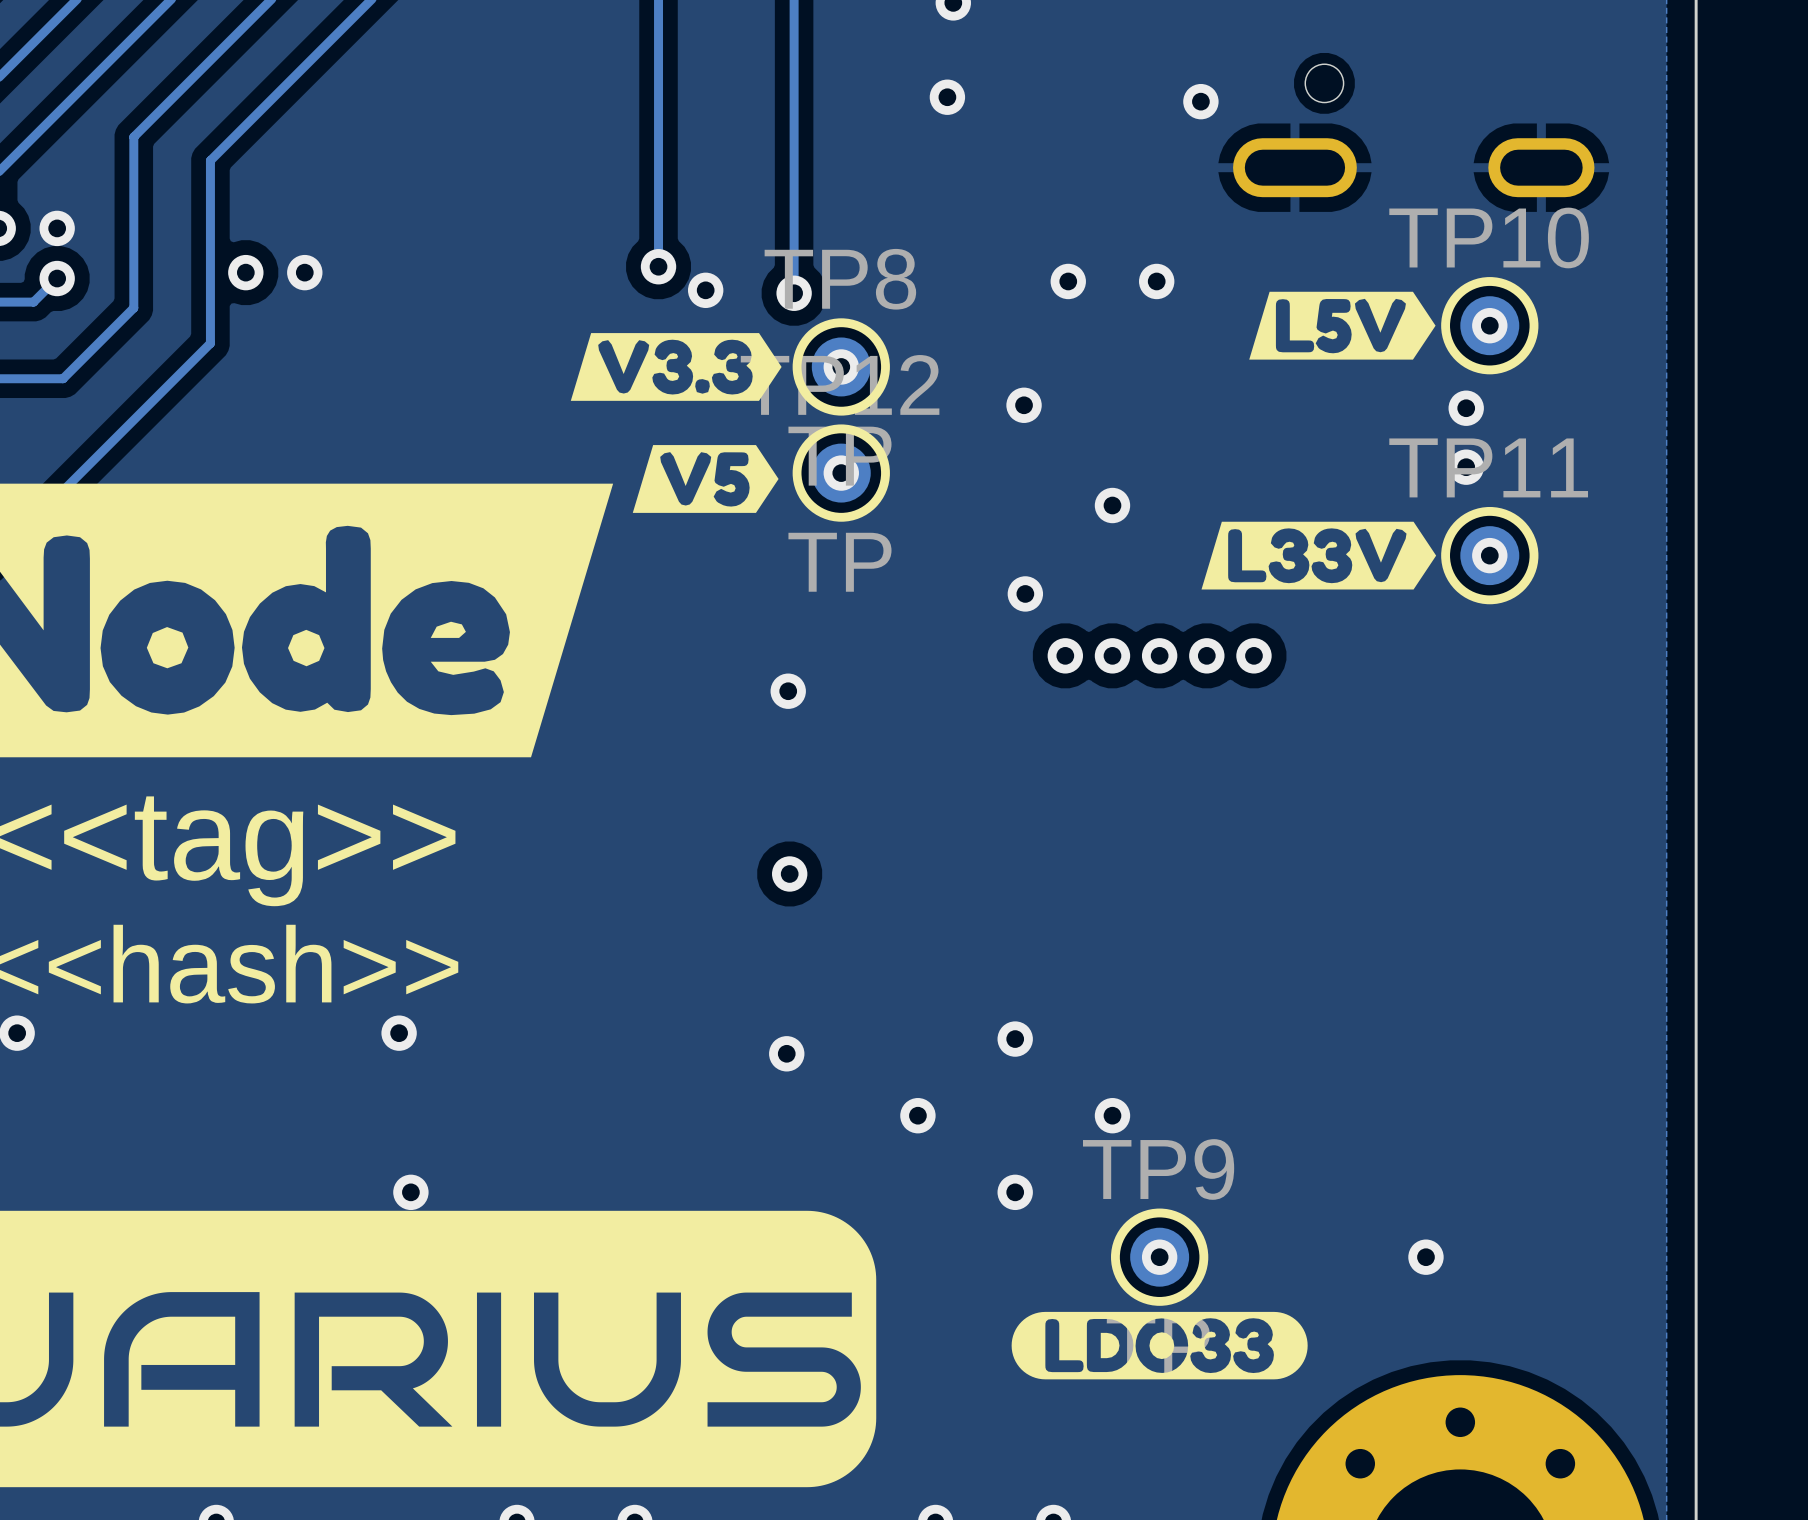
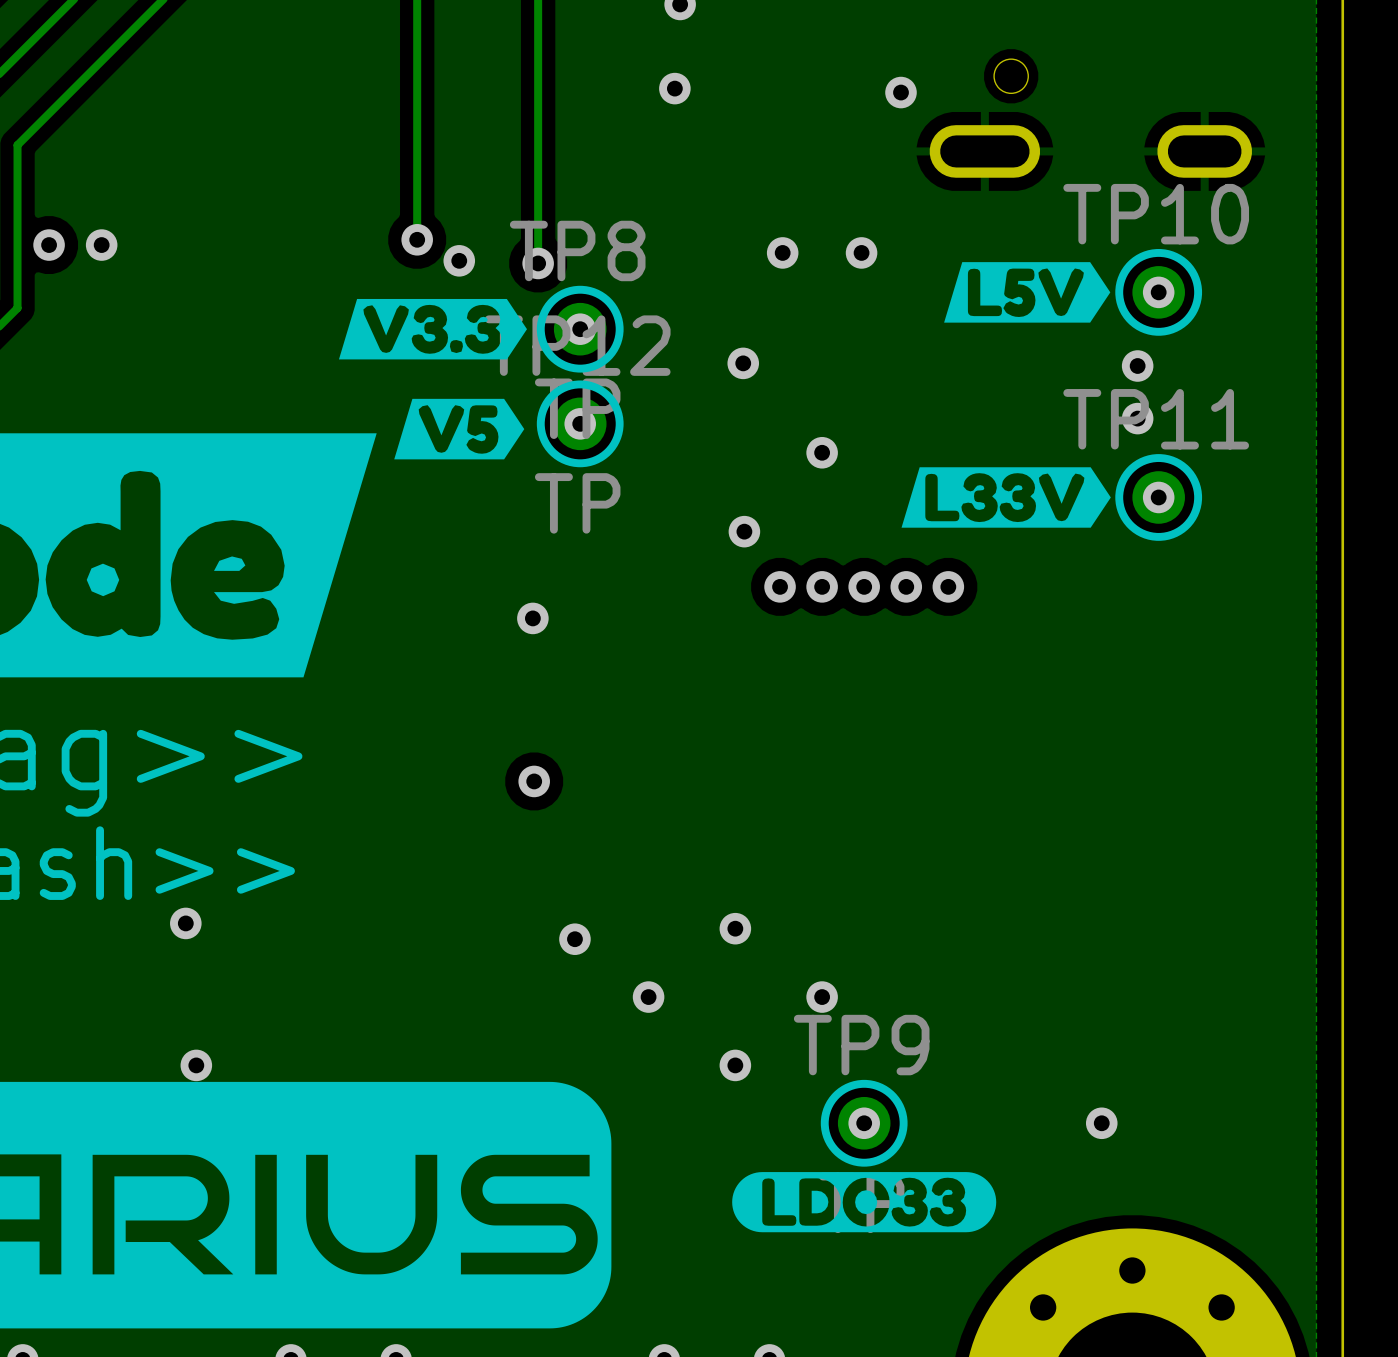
via position: (786, 1053) -> (574, 939)

